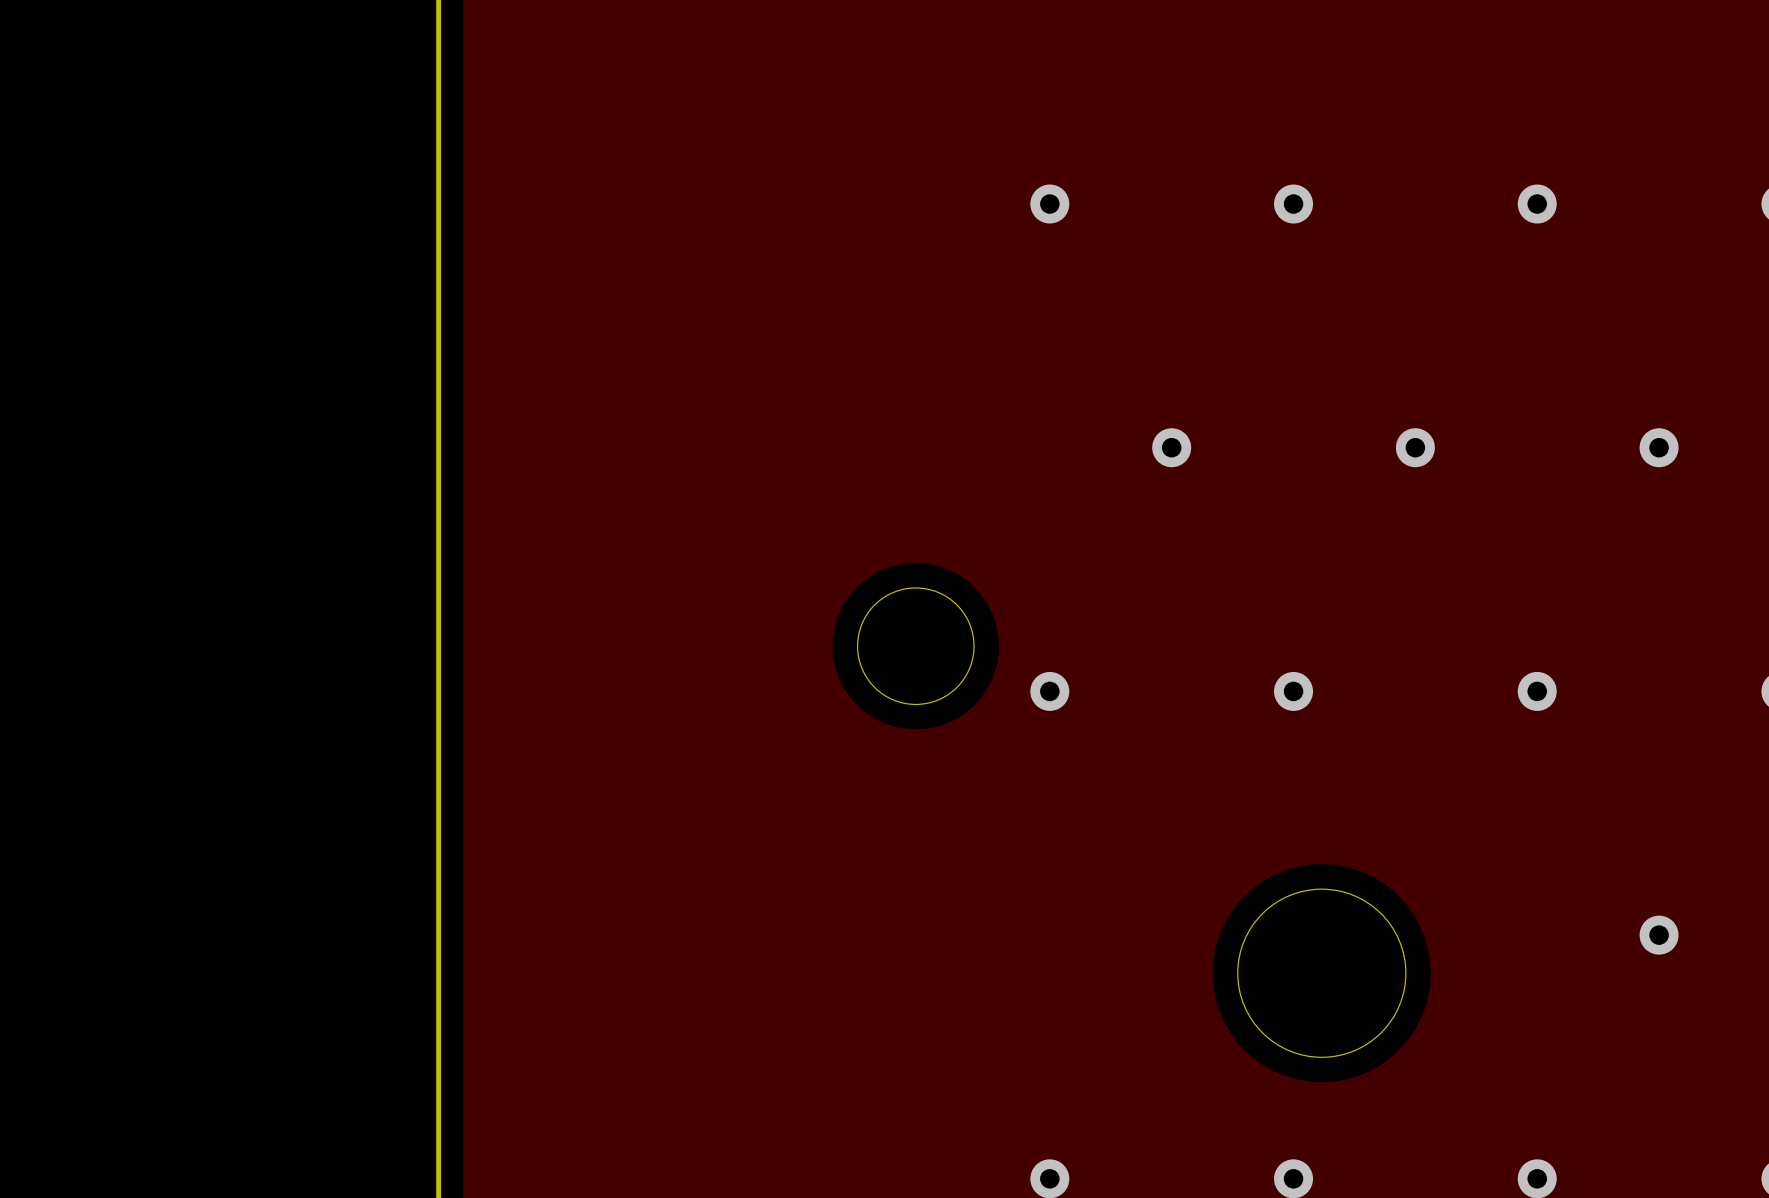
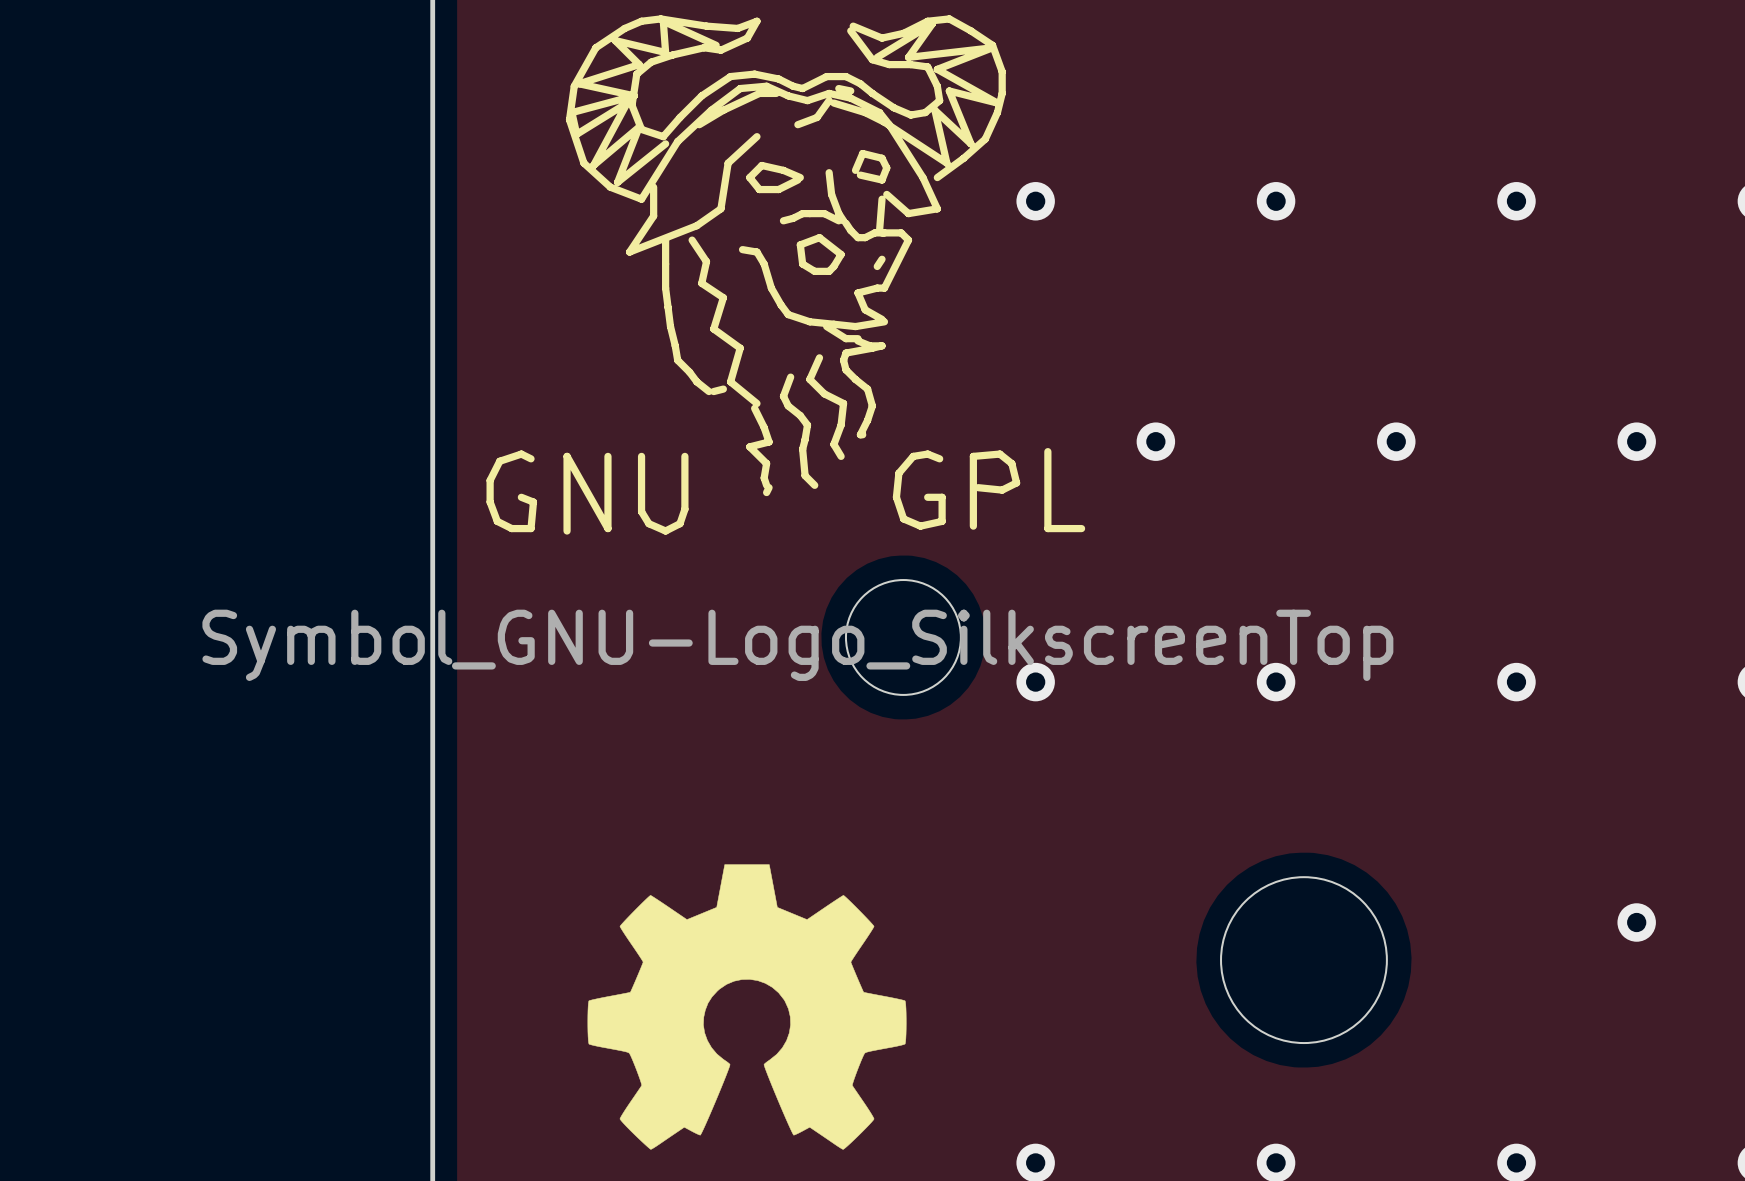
drawing: none -> [486, 15, 1086, 535]
drawing: none -> [587, 864, 907, 1150]

